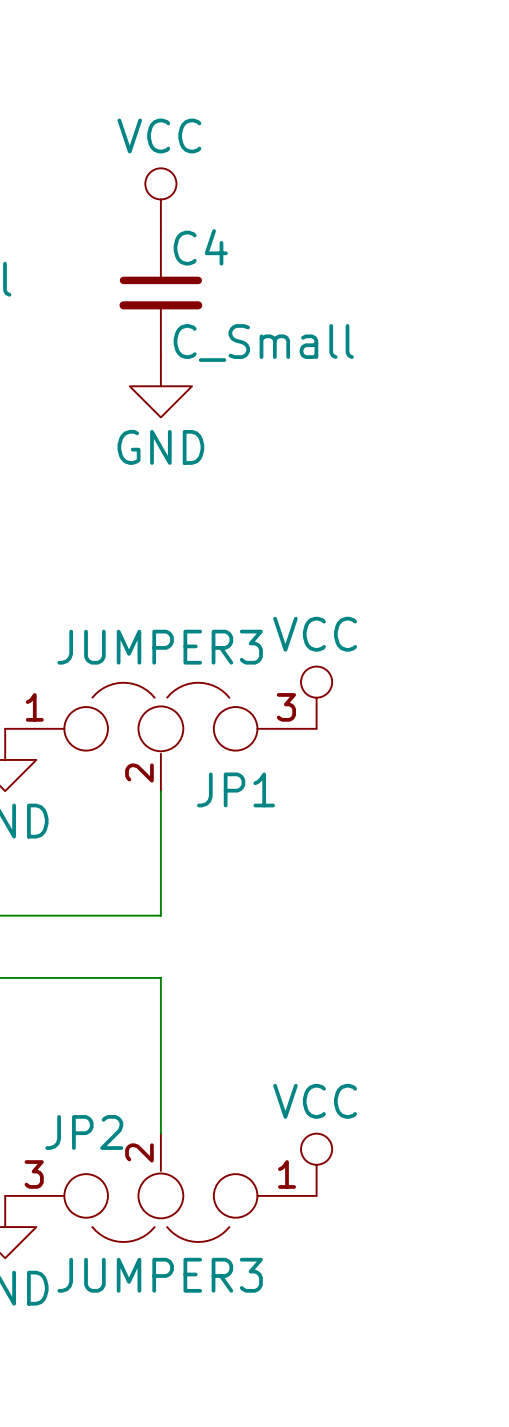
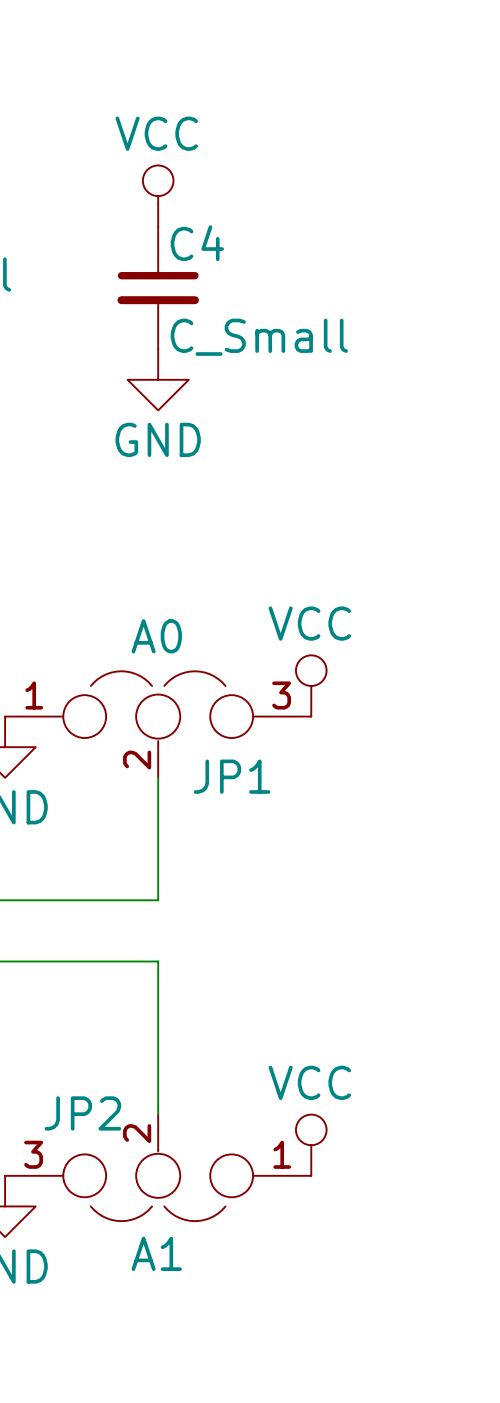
JP1 value: JUMPER3 (160, 647) -> A0 (156, 636)
JP2 value: JUMPER3 (160, 1275) -> A1 (156, 1253)

